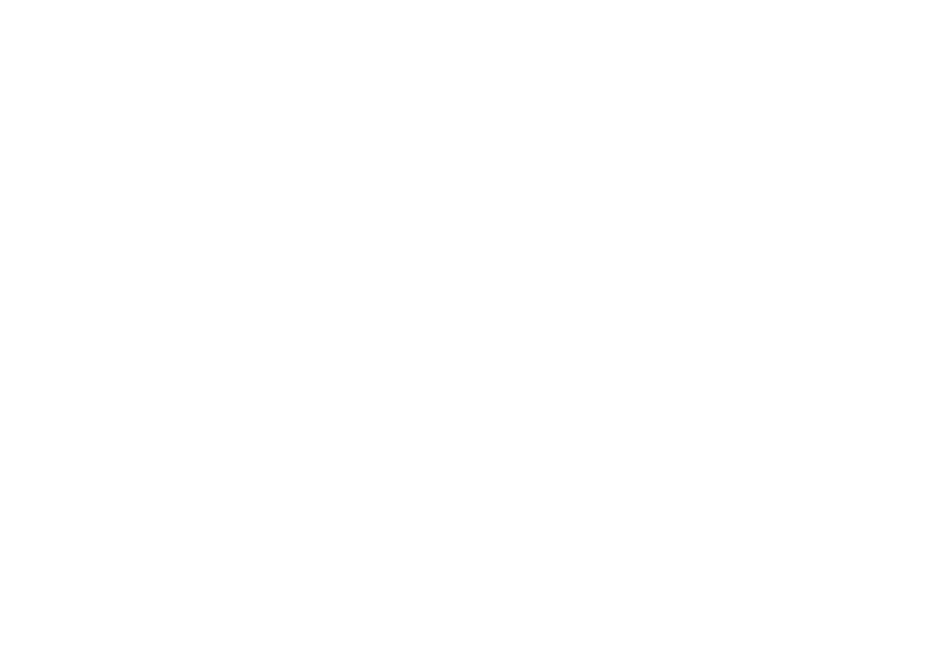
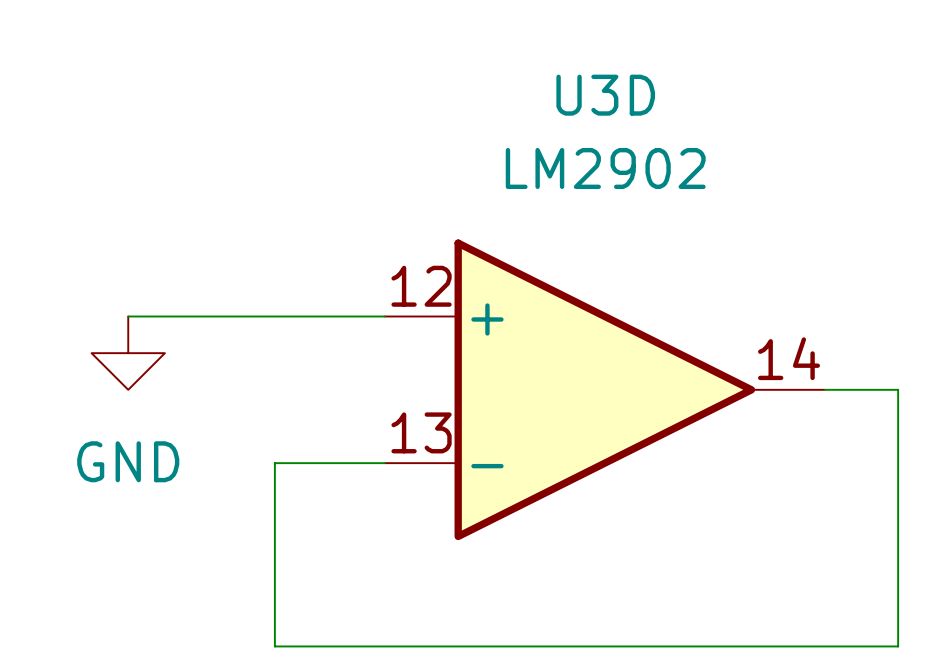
wire: none -> (128, 316) (384, 316)
power symbol: none -> GND (128, 353)
U3D: none -> LM2902 (604, 389)
wire: none -> (824, 389) (898, 389) (898, 646) (274, 646) (274, 463) (384, 463)

